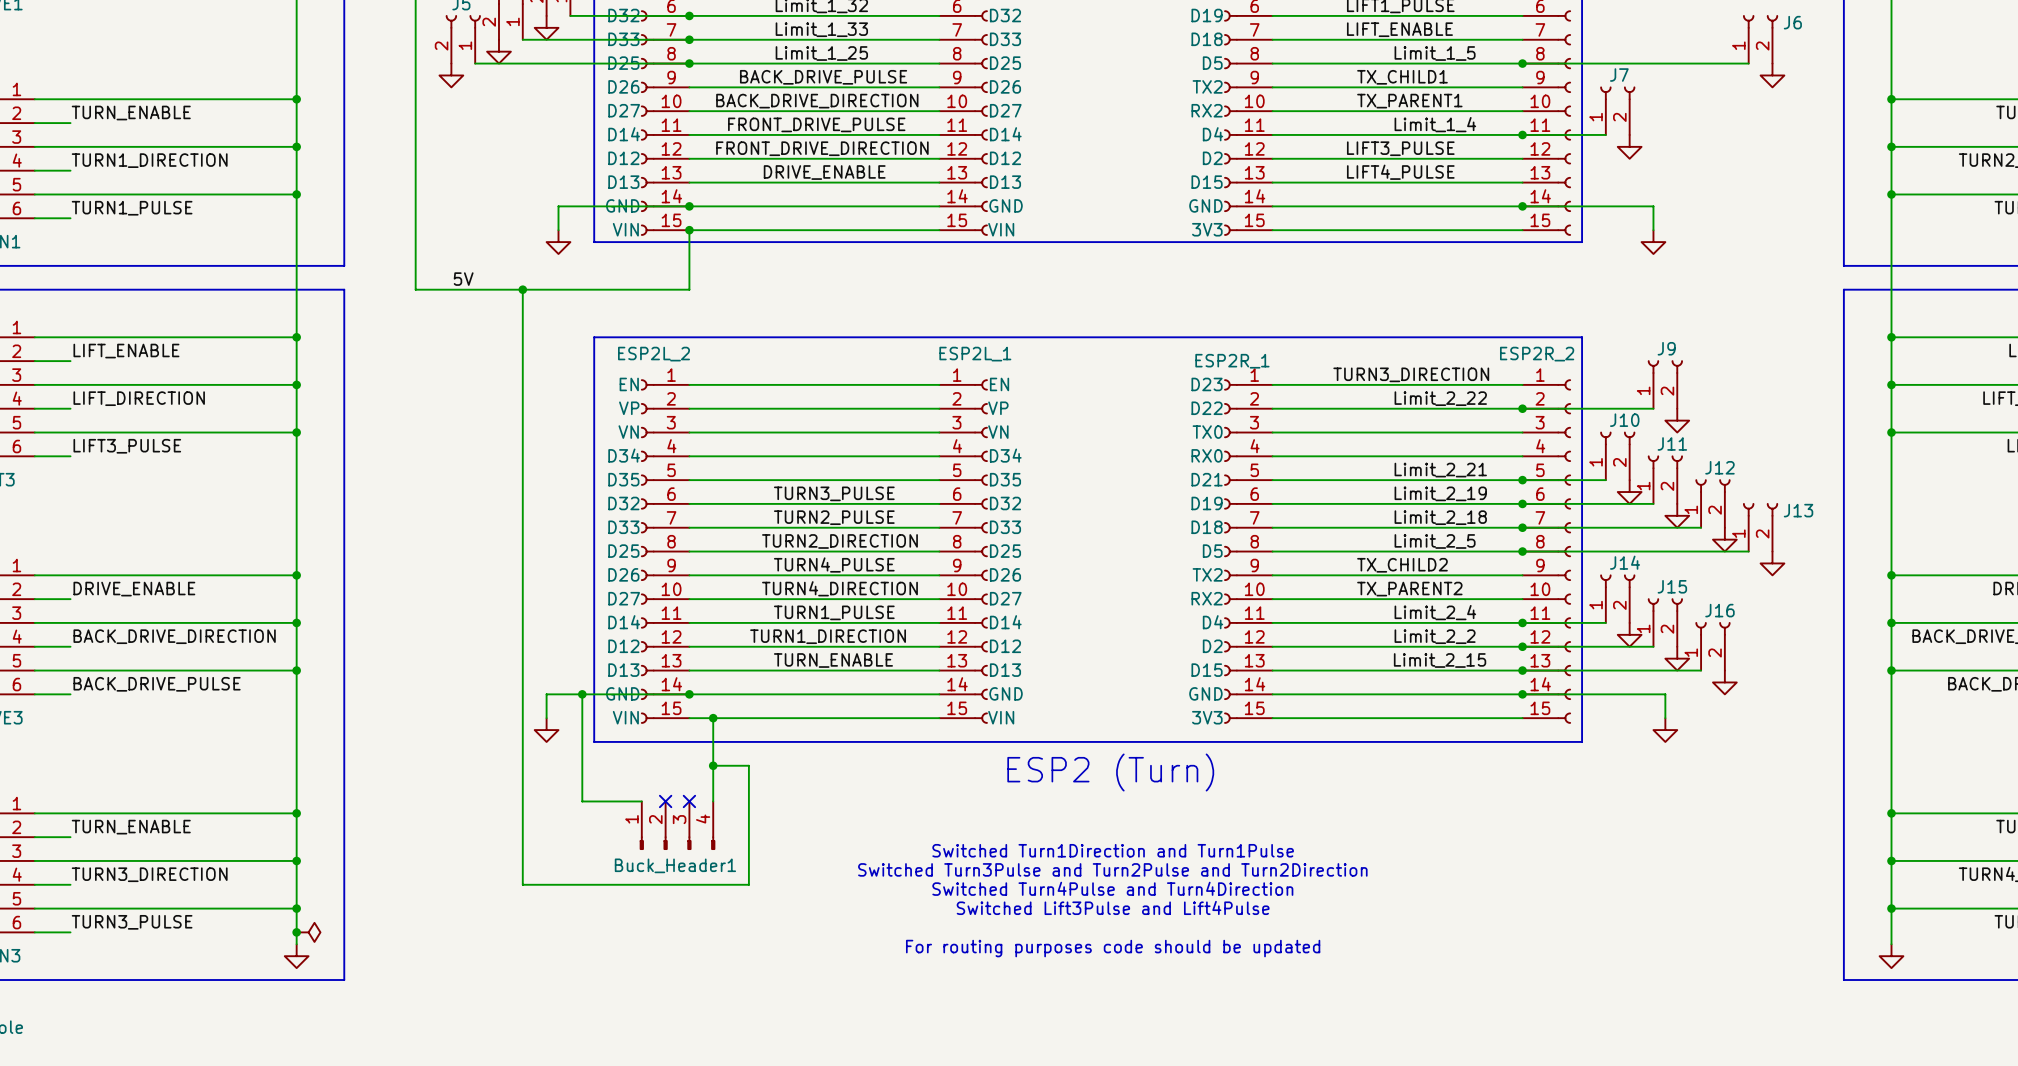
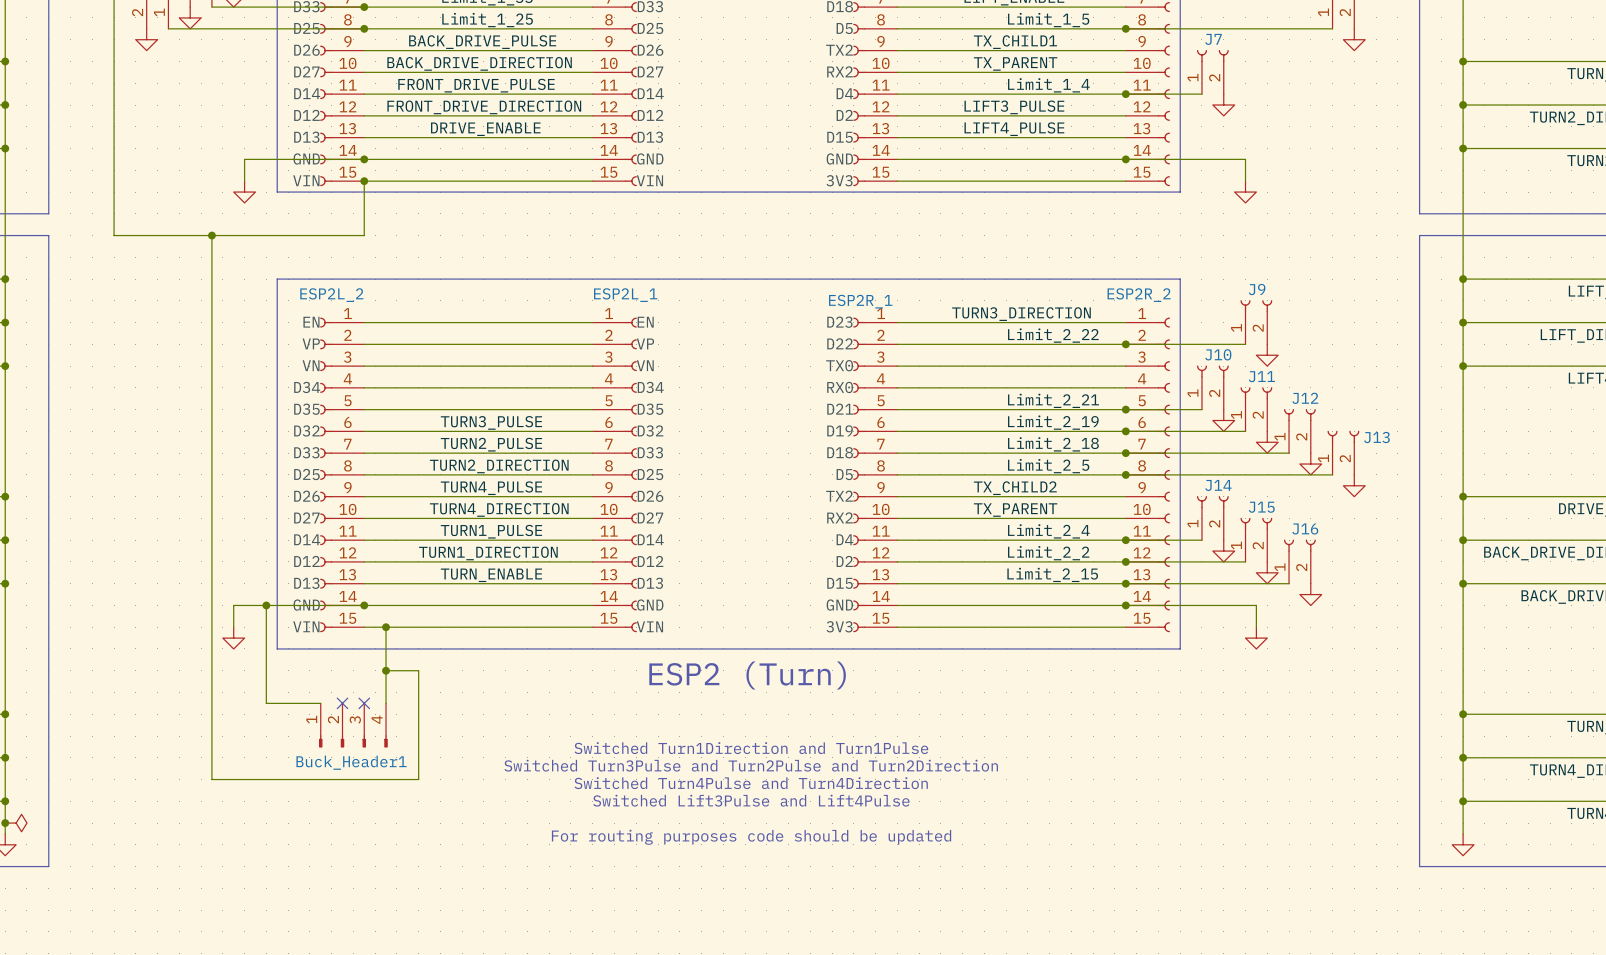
label: TX_PARENT1 (1409, 101) -> TX_PARENT (1015, 63)
label: 5V (463, 279) -> none
label: TX_PARENT2 (1409, 589) -> TX_PARENT (1015, 510)

